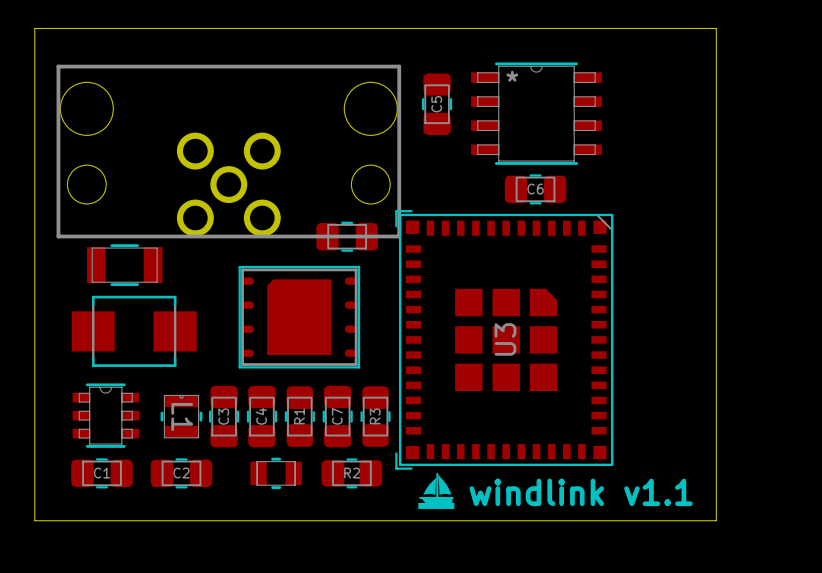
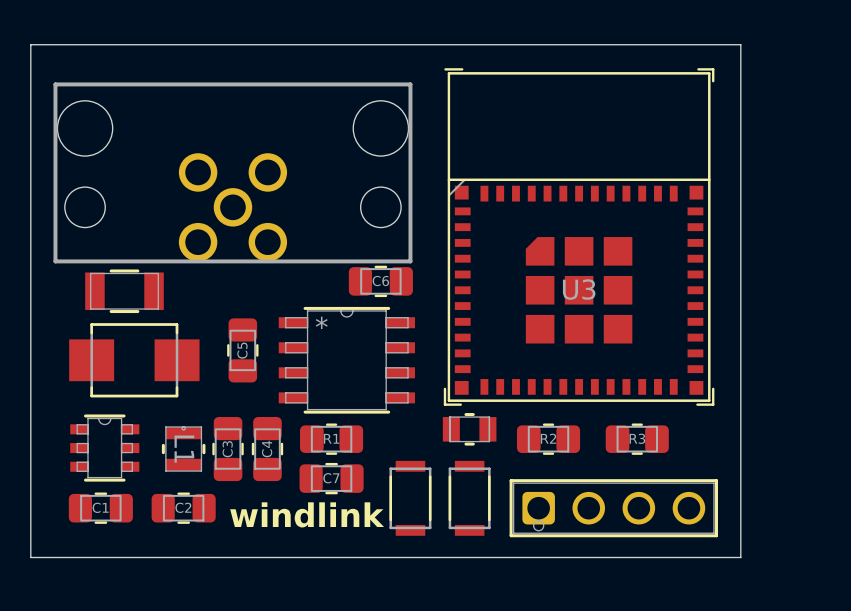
C5 position: (437, 104) -> (242, 350)
part position: (536, 113) -> (346, 360)
C6 position: (535, 189) -> (380, 281)
U3 footprint: [395, 210, 614, 470] -> [443, 68, 715, 406]
part: (347, 236) -> none
part: (299, 317) -> none
U3 name position: U3 (505, 339) -> U3 (579, 289)
R1 rotation: 0° (299, 416) -> 90° clockwise (331, 439)
C7 rotation: 0° (337, 416) -> 90° clockwise (331, 478)
R3 rotation: 0° (375, 416) -> 90° clockwise (637, 439)
R3 position: (375, 416) -> (637, 439)
part: none -> (410, 498)
part: none -> (469, 498)
drawing: [418, 472, 455, 509] -> none
part position: (276, 473) -> (469, 429)
R2 position: (351, 473) -> (548, 439)
part: none -> (613, 508)
text: none -> windlink (307, 514)
text: windlink v1.1 (581, 492) -> none

